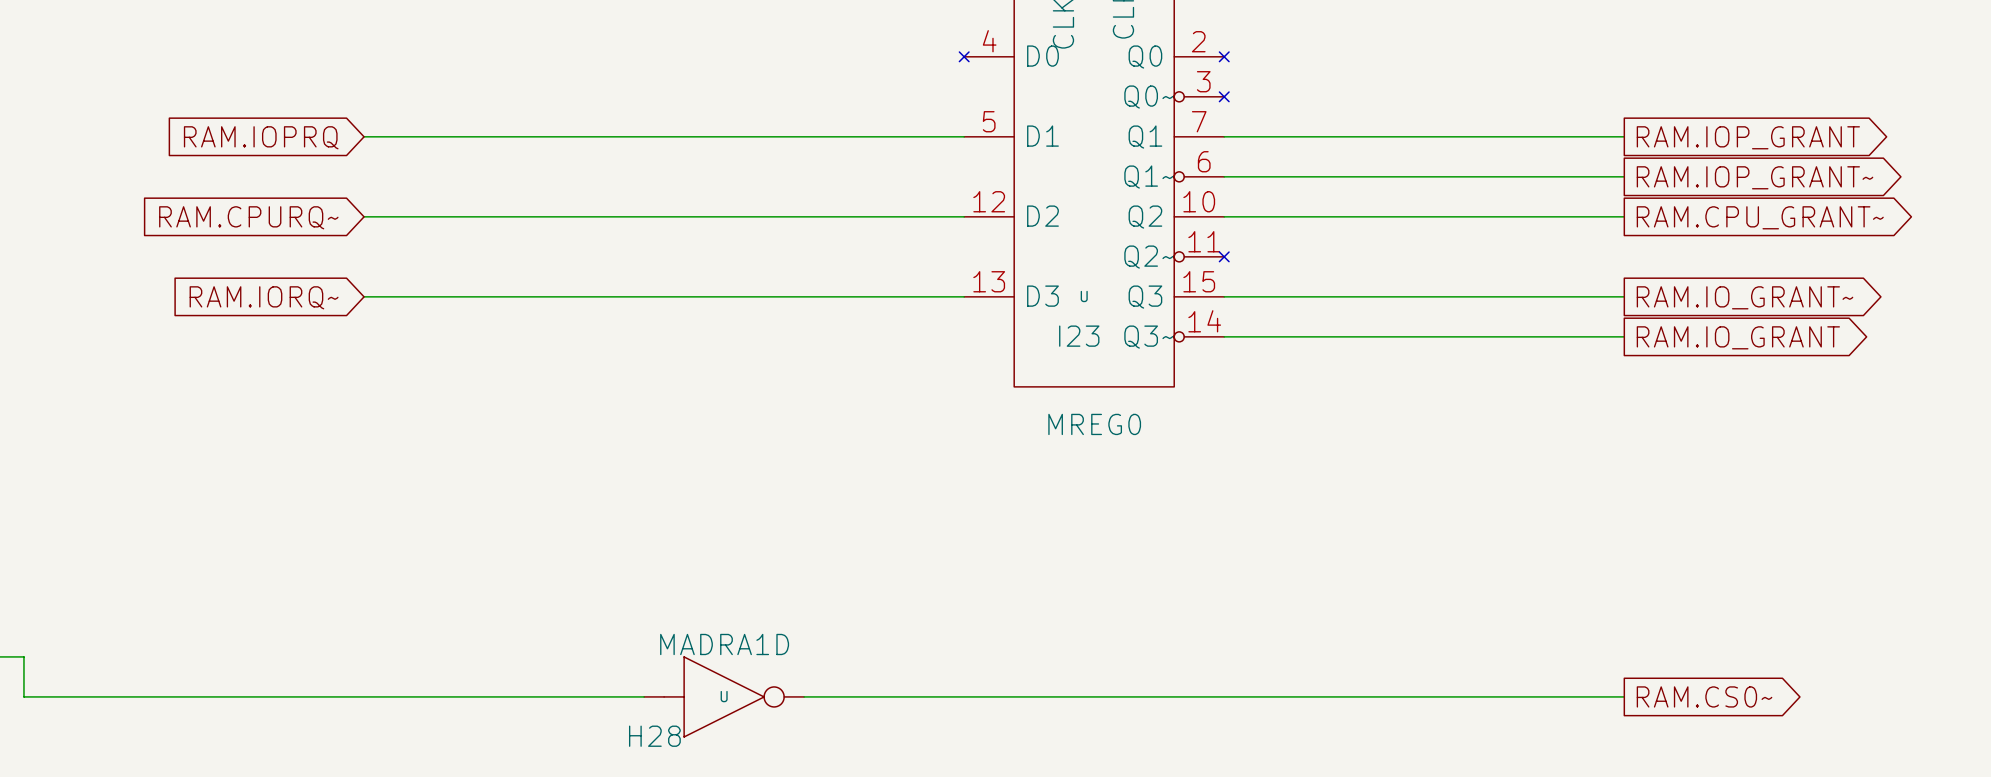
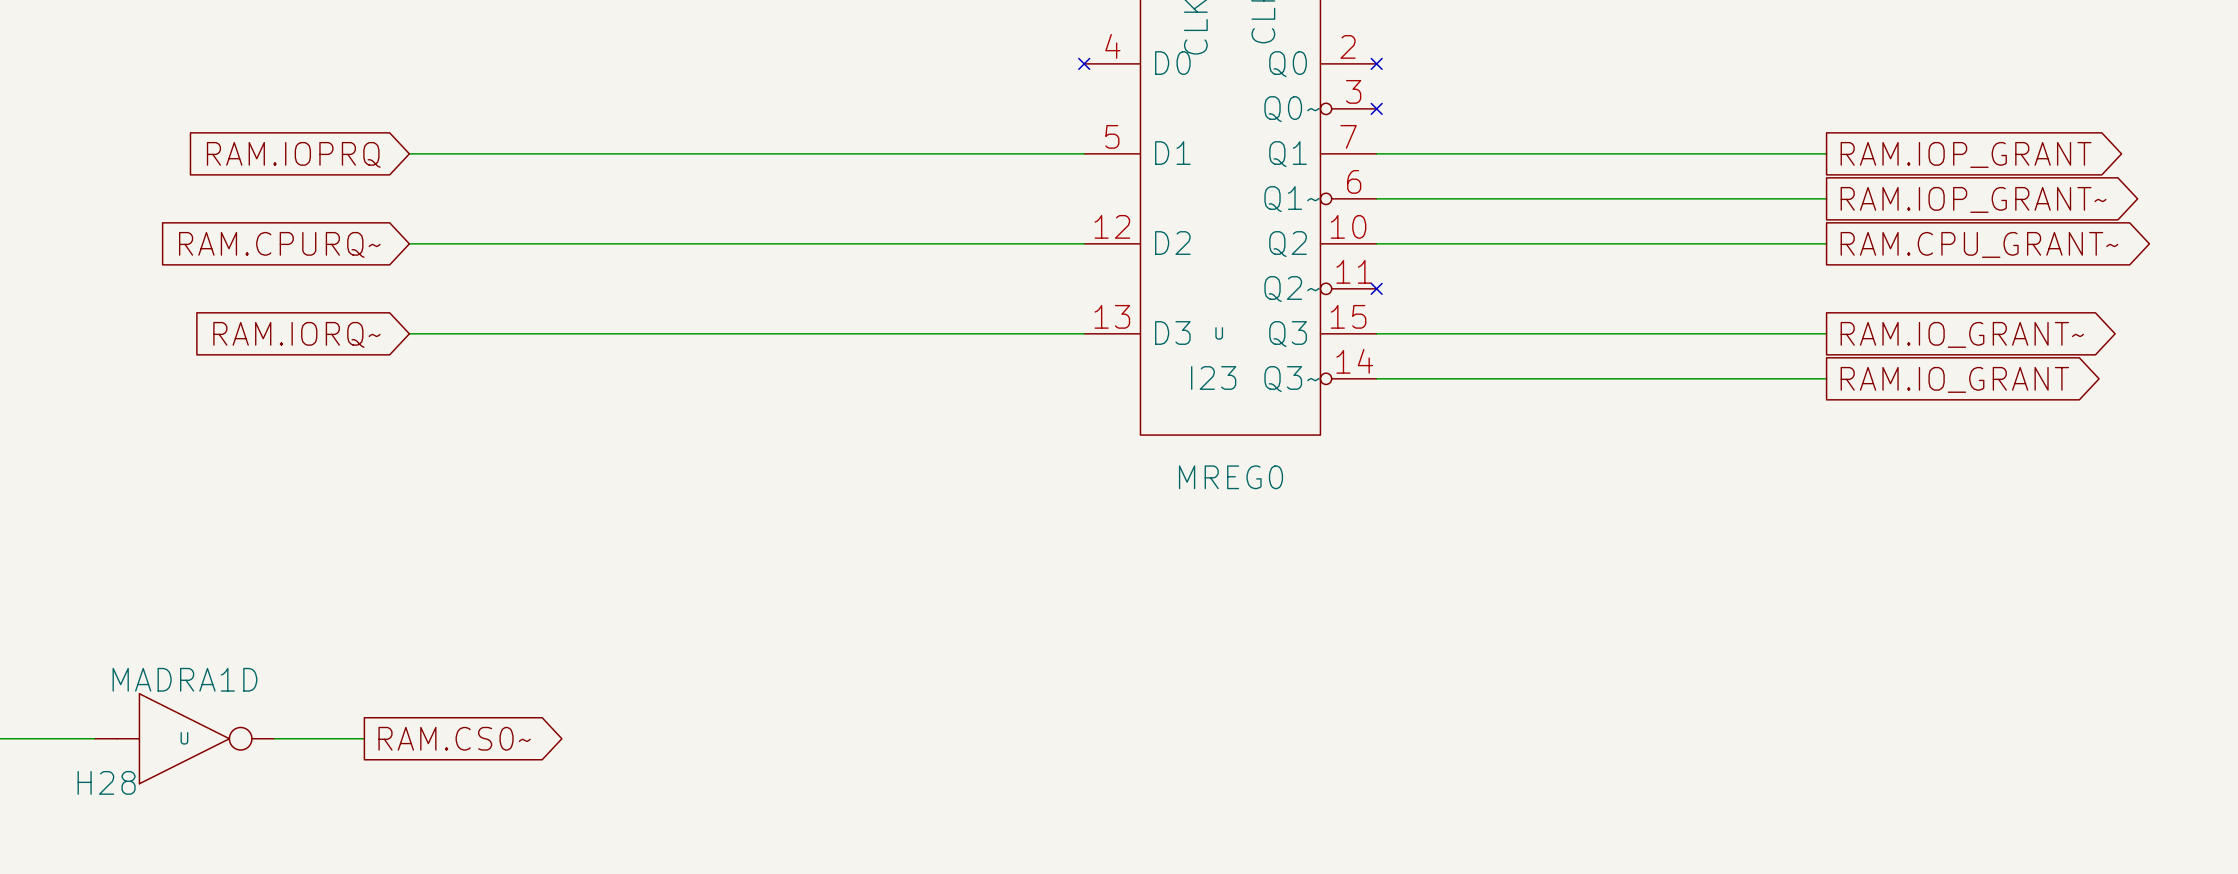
wire: (23, 656) (23, 696) (644, 696) -> (26, 738) (94, 738)
U: none -> (184, 738)
wire: none -> (274, 738) (364, 738)
global label: none -> RAM.CS0~ (454, 738)
U: (724, 696) -> none
wire: (804, 696) (1624, 696) -> none
global label: RAM.CS0~ (1704, 696) -> none

